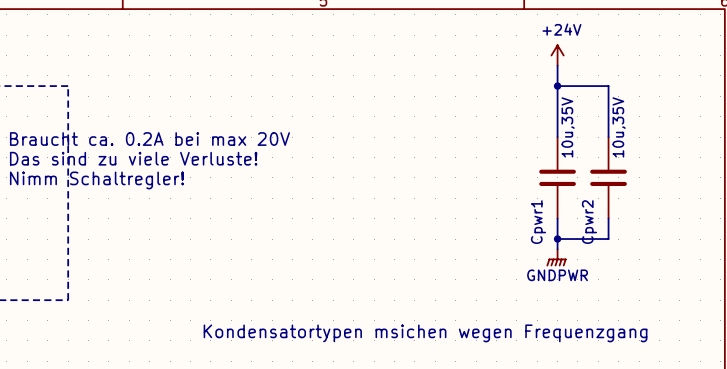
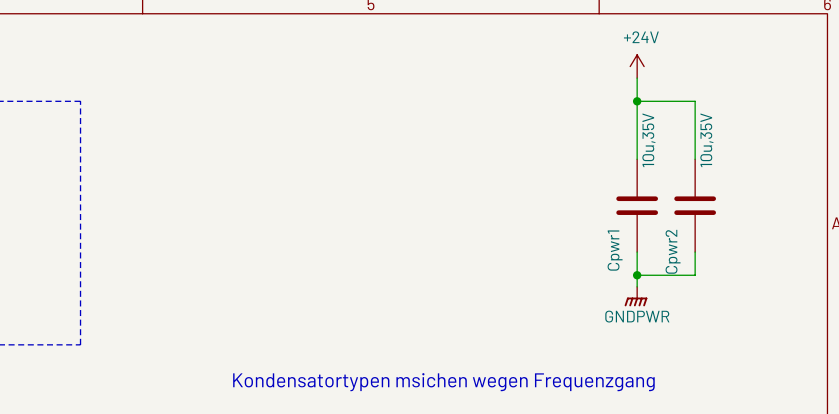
text: Braucht ca. 0.2A bei max 20V (149, 139) -> none
text: Das sind zu viele Verluste! (133, 158) -> none
text: Nimm Schaltregler! (96, 180) -> none

